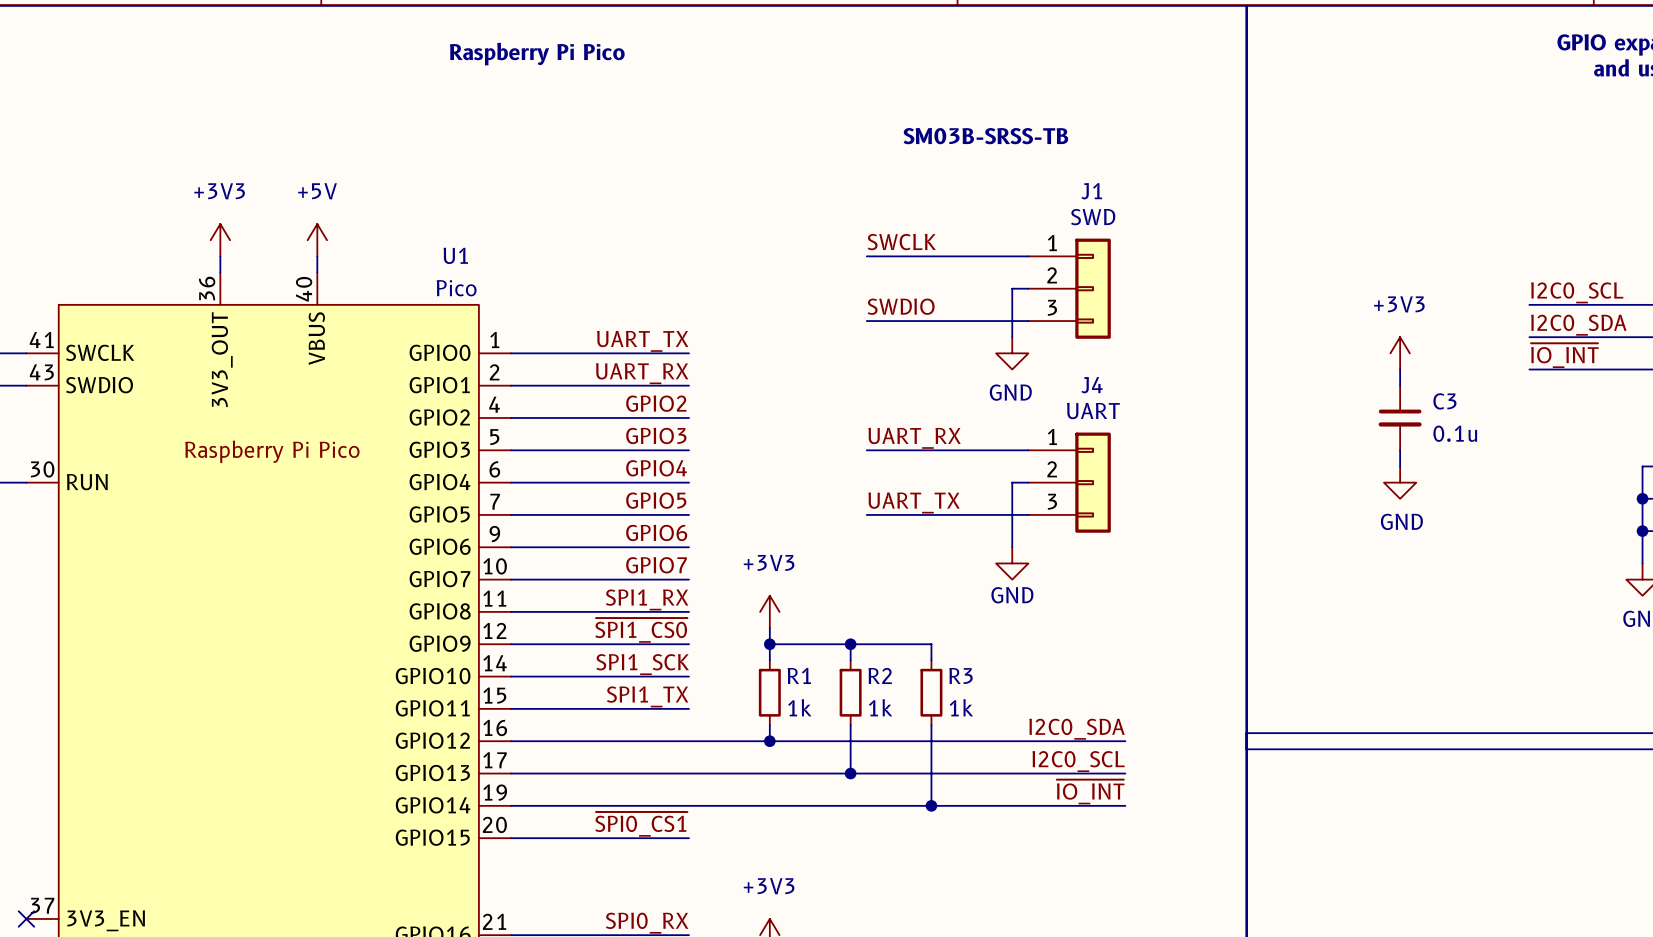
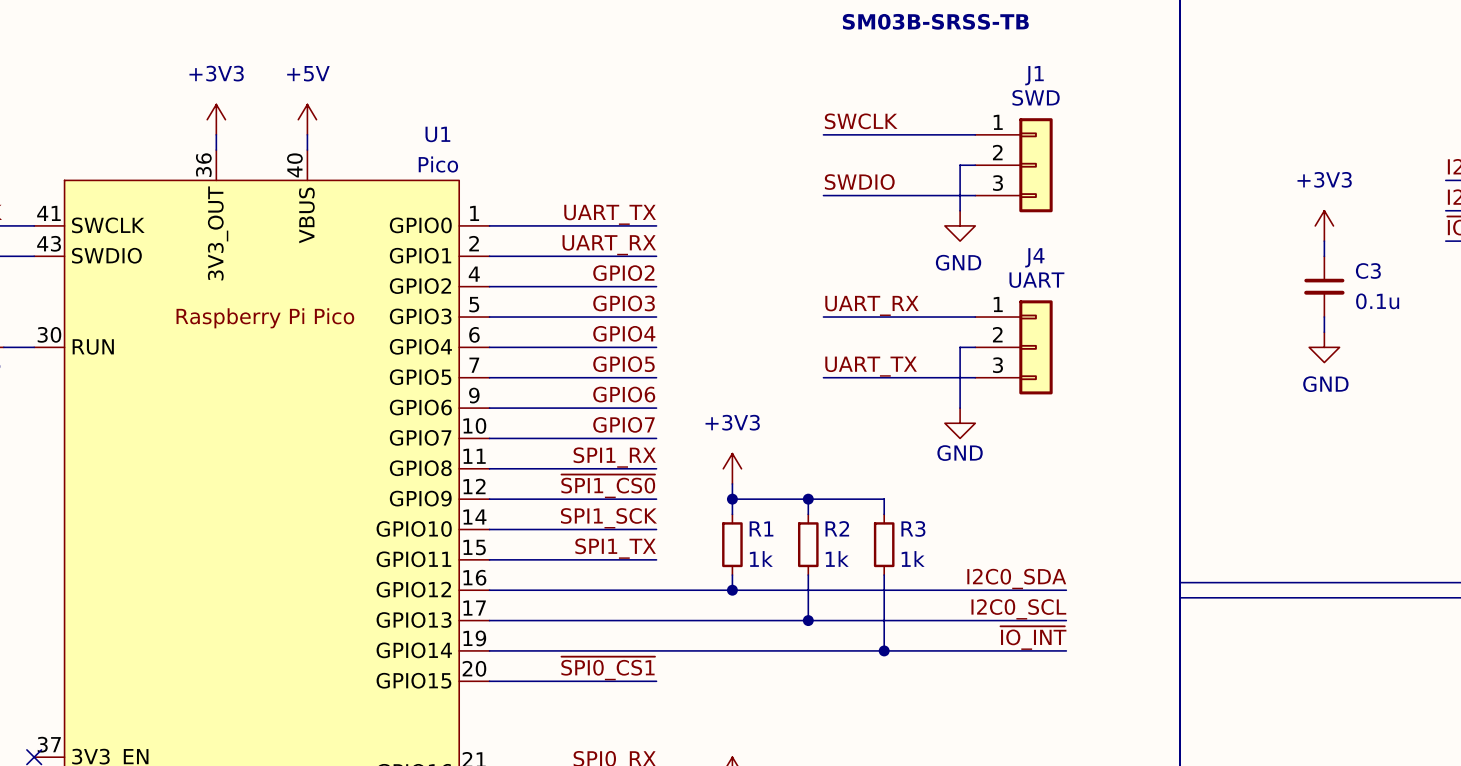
power symbol text: +3V3 (769, 886) -> none

